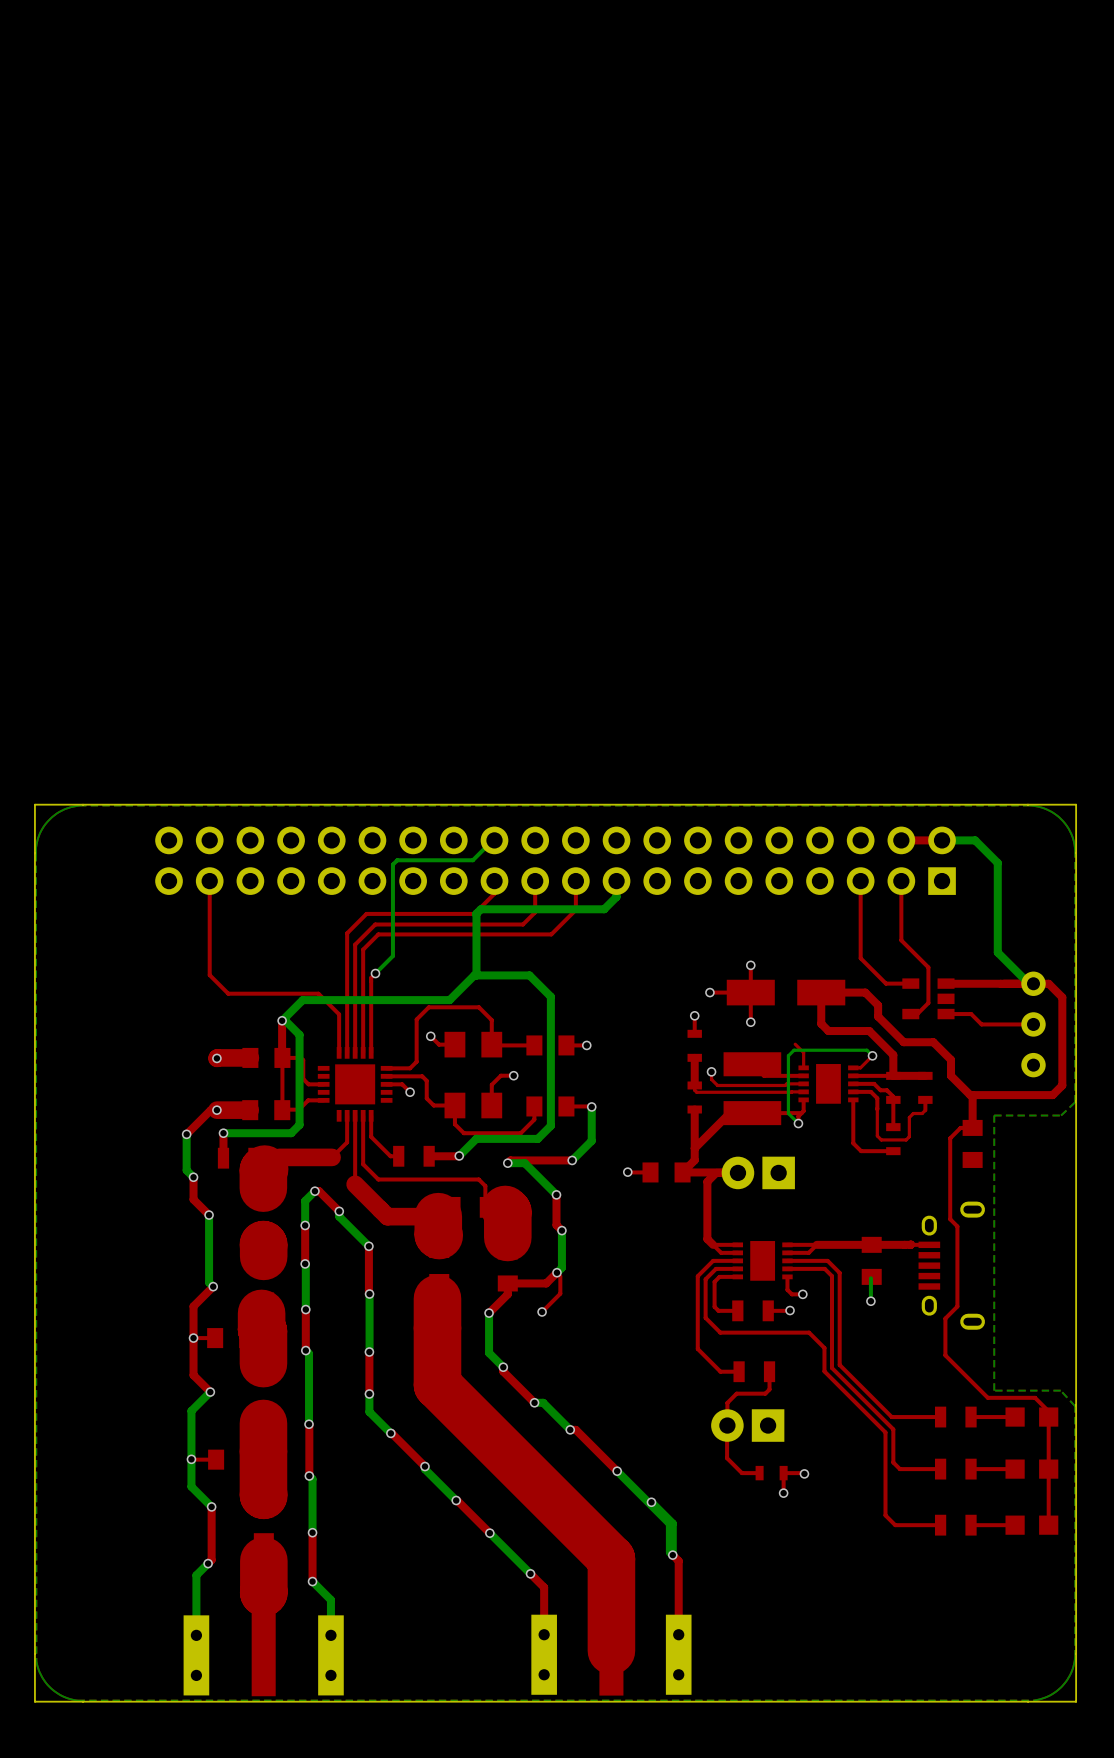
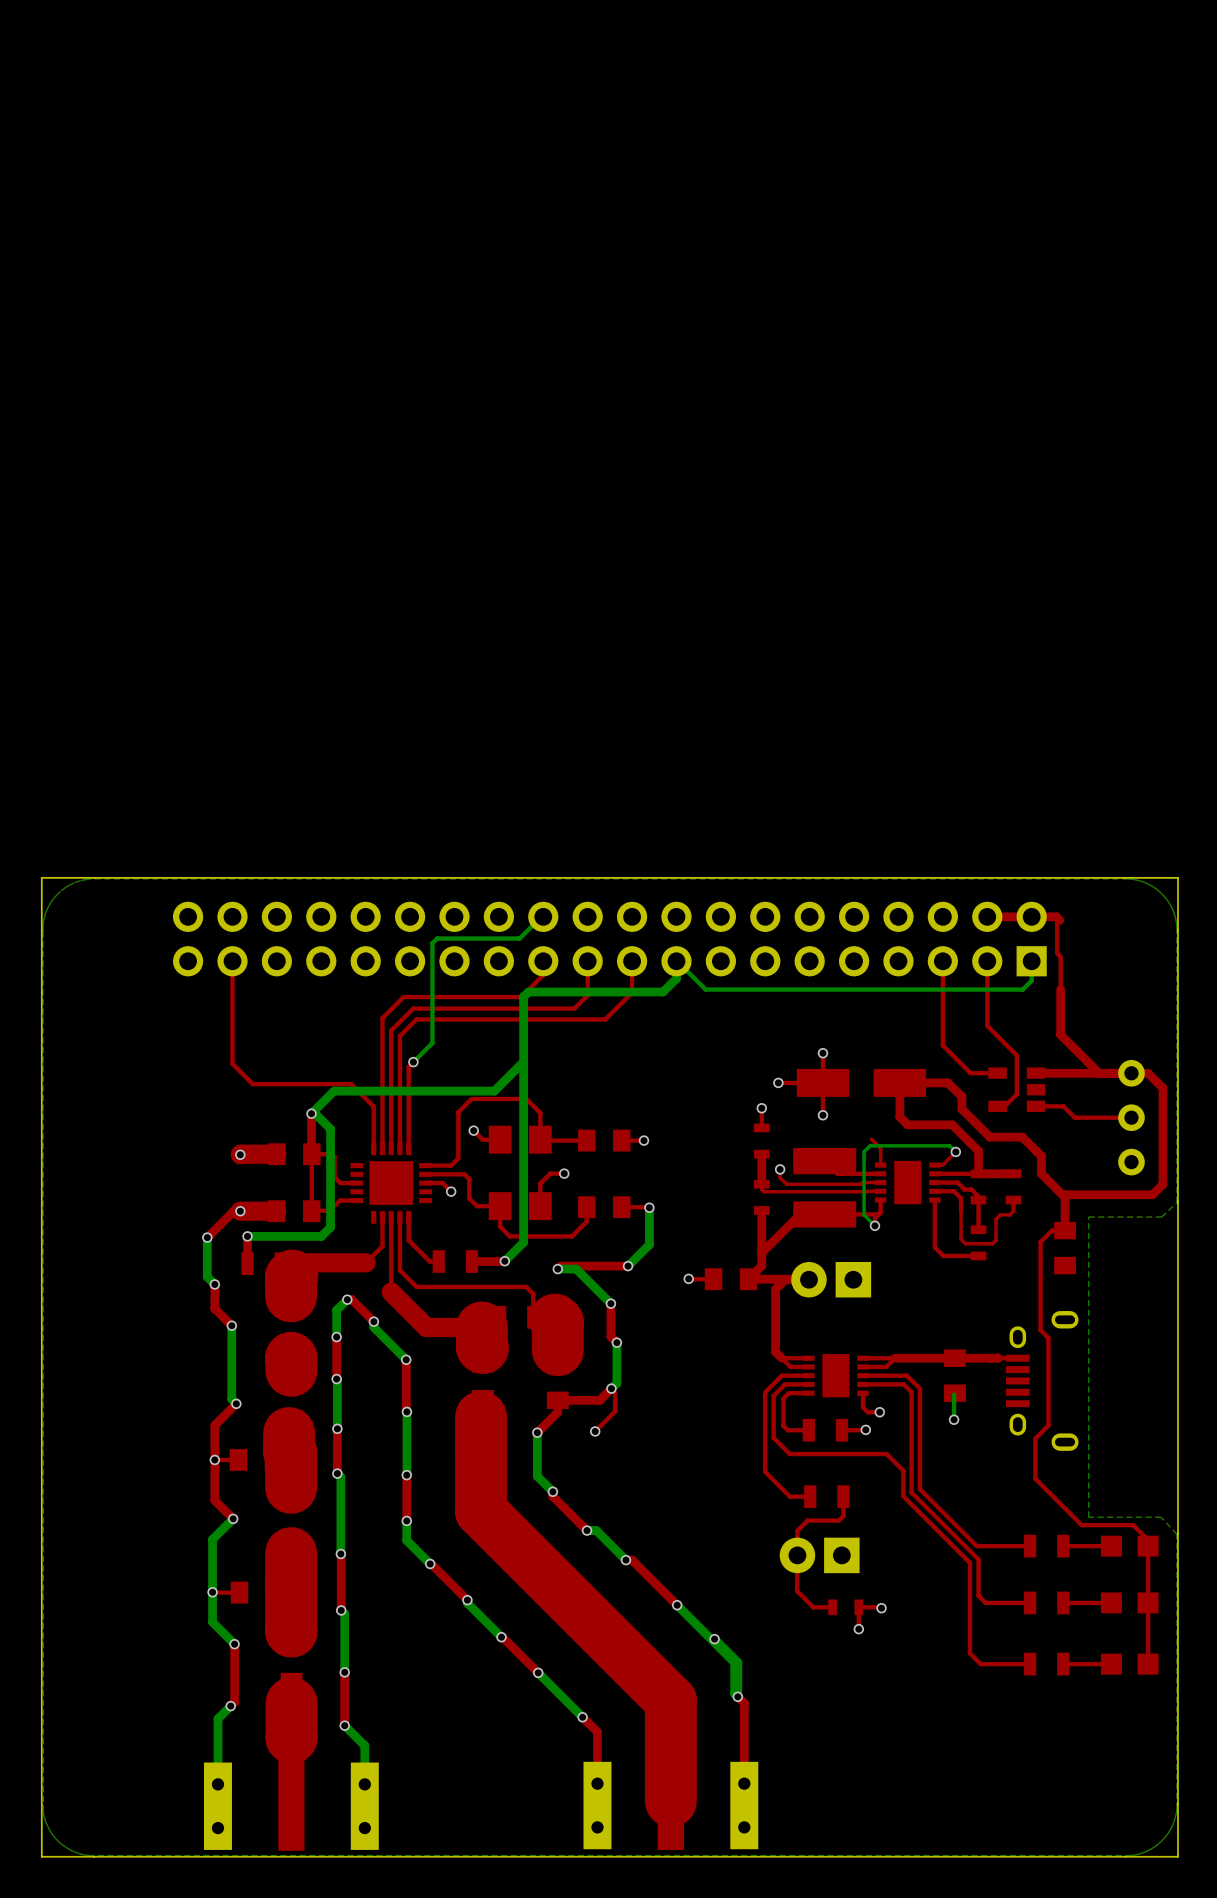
top track: none -> (1031, 916) (1056, 916) (1059, 920) (1057, 922) (1057, 953) (1060, 957) (1060, 1034) (1099, 1073)
bottom track: (942, 840) (975, 840) (997, 862) (997, 952) (1029, 983) (1033, 983) -> none
bottom track: none -> (1031, 961) (1031, 980) (1022, 989) (705, 989) (677, 961)
bottom track: (476, 975) (529, 975) (550, 996) (550, 1125) (537, 1138) (476, 1138) -> (523, 1064) (523, 1242)

